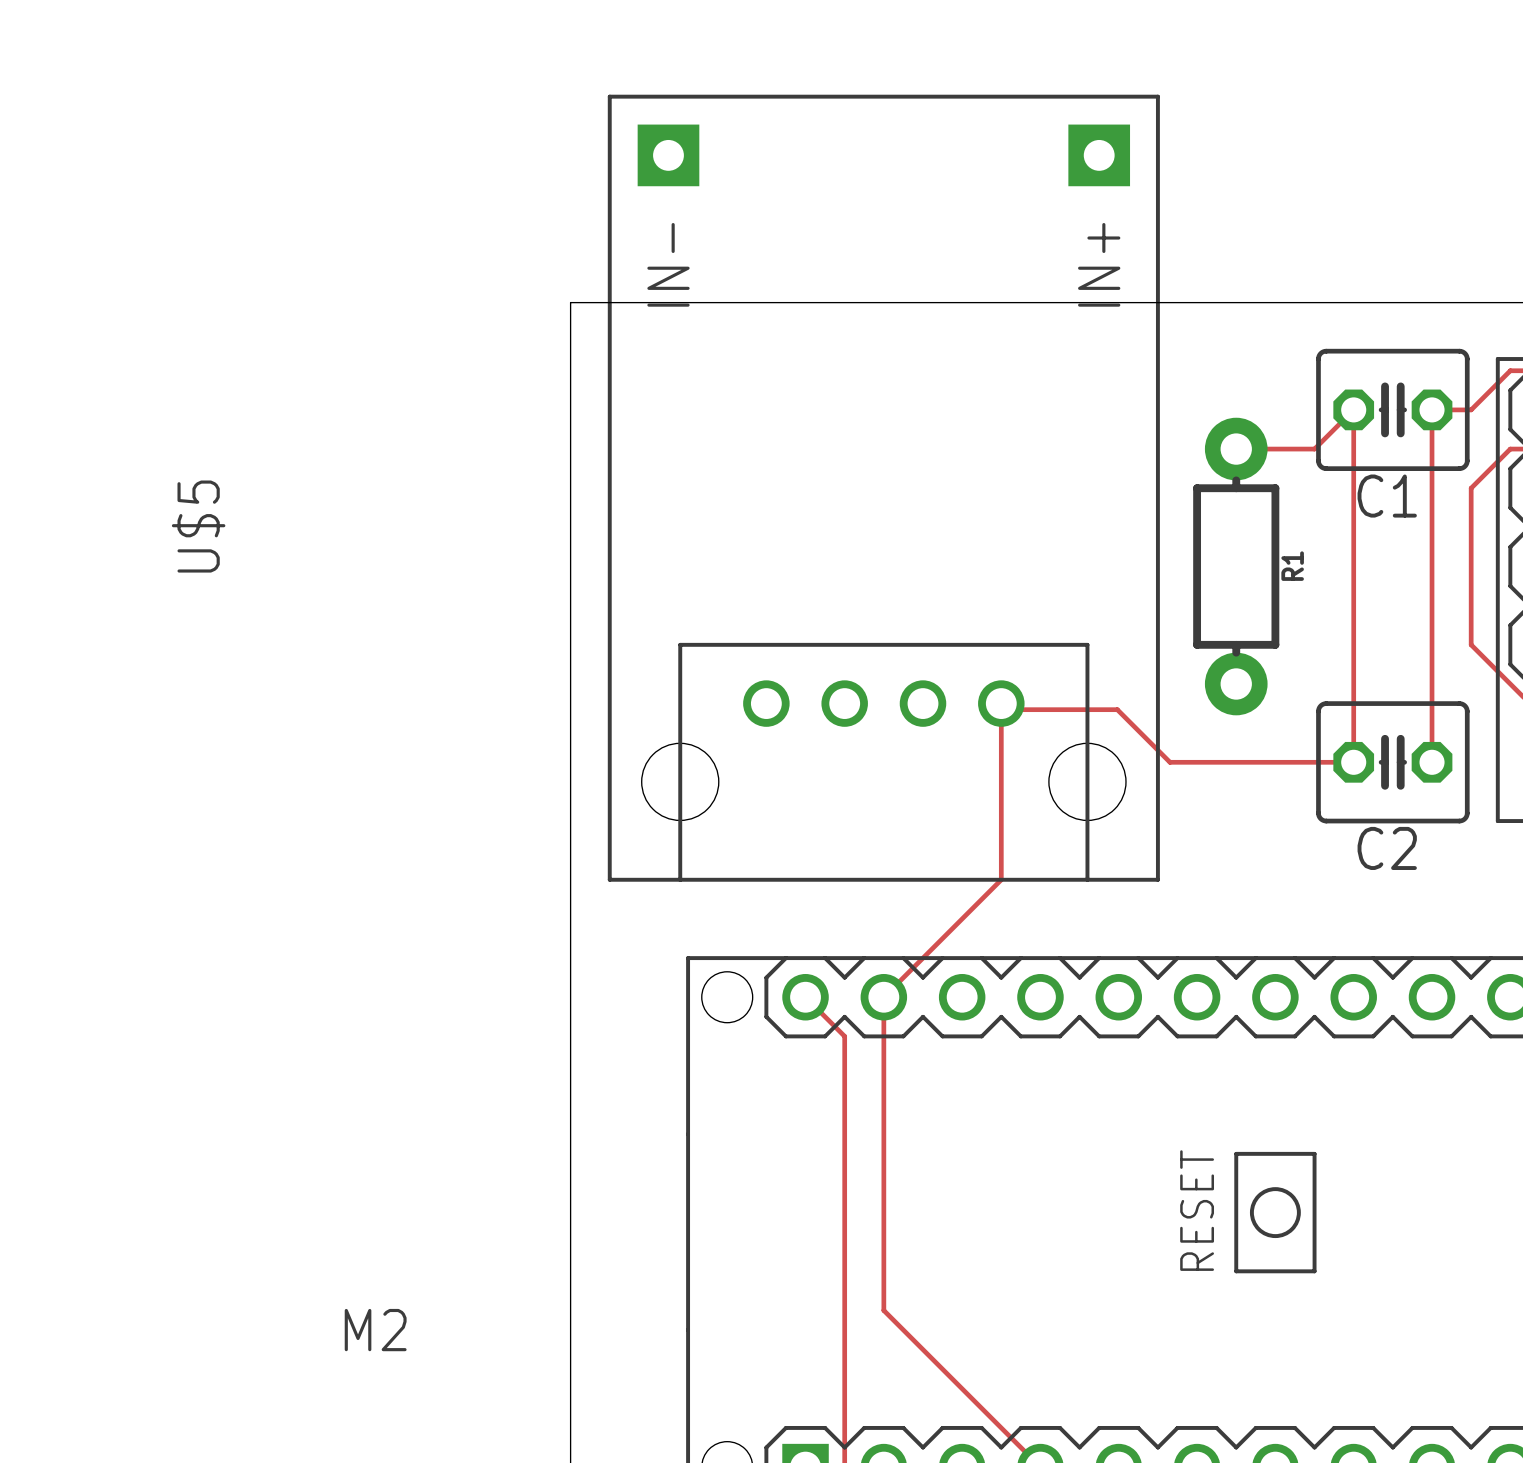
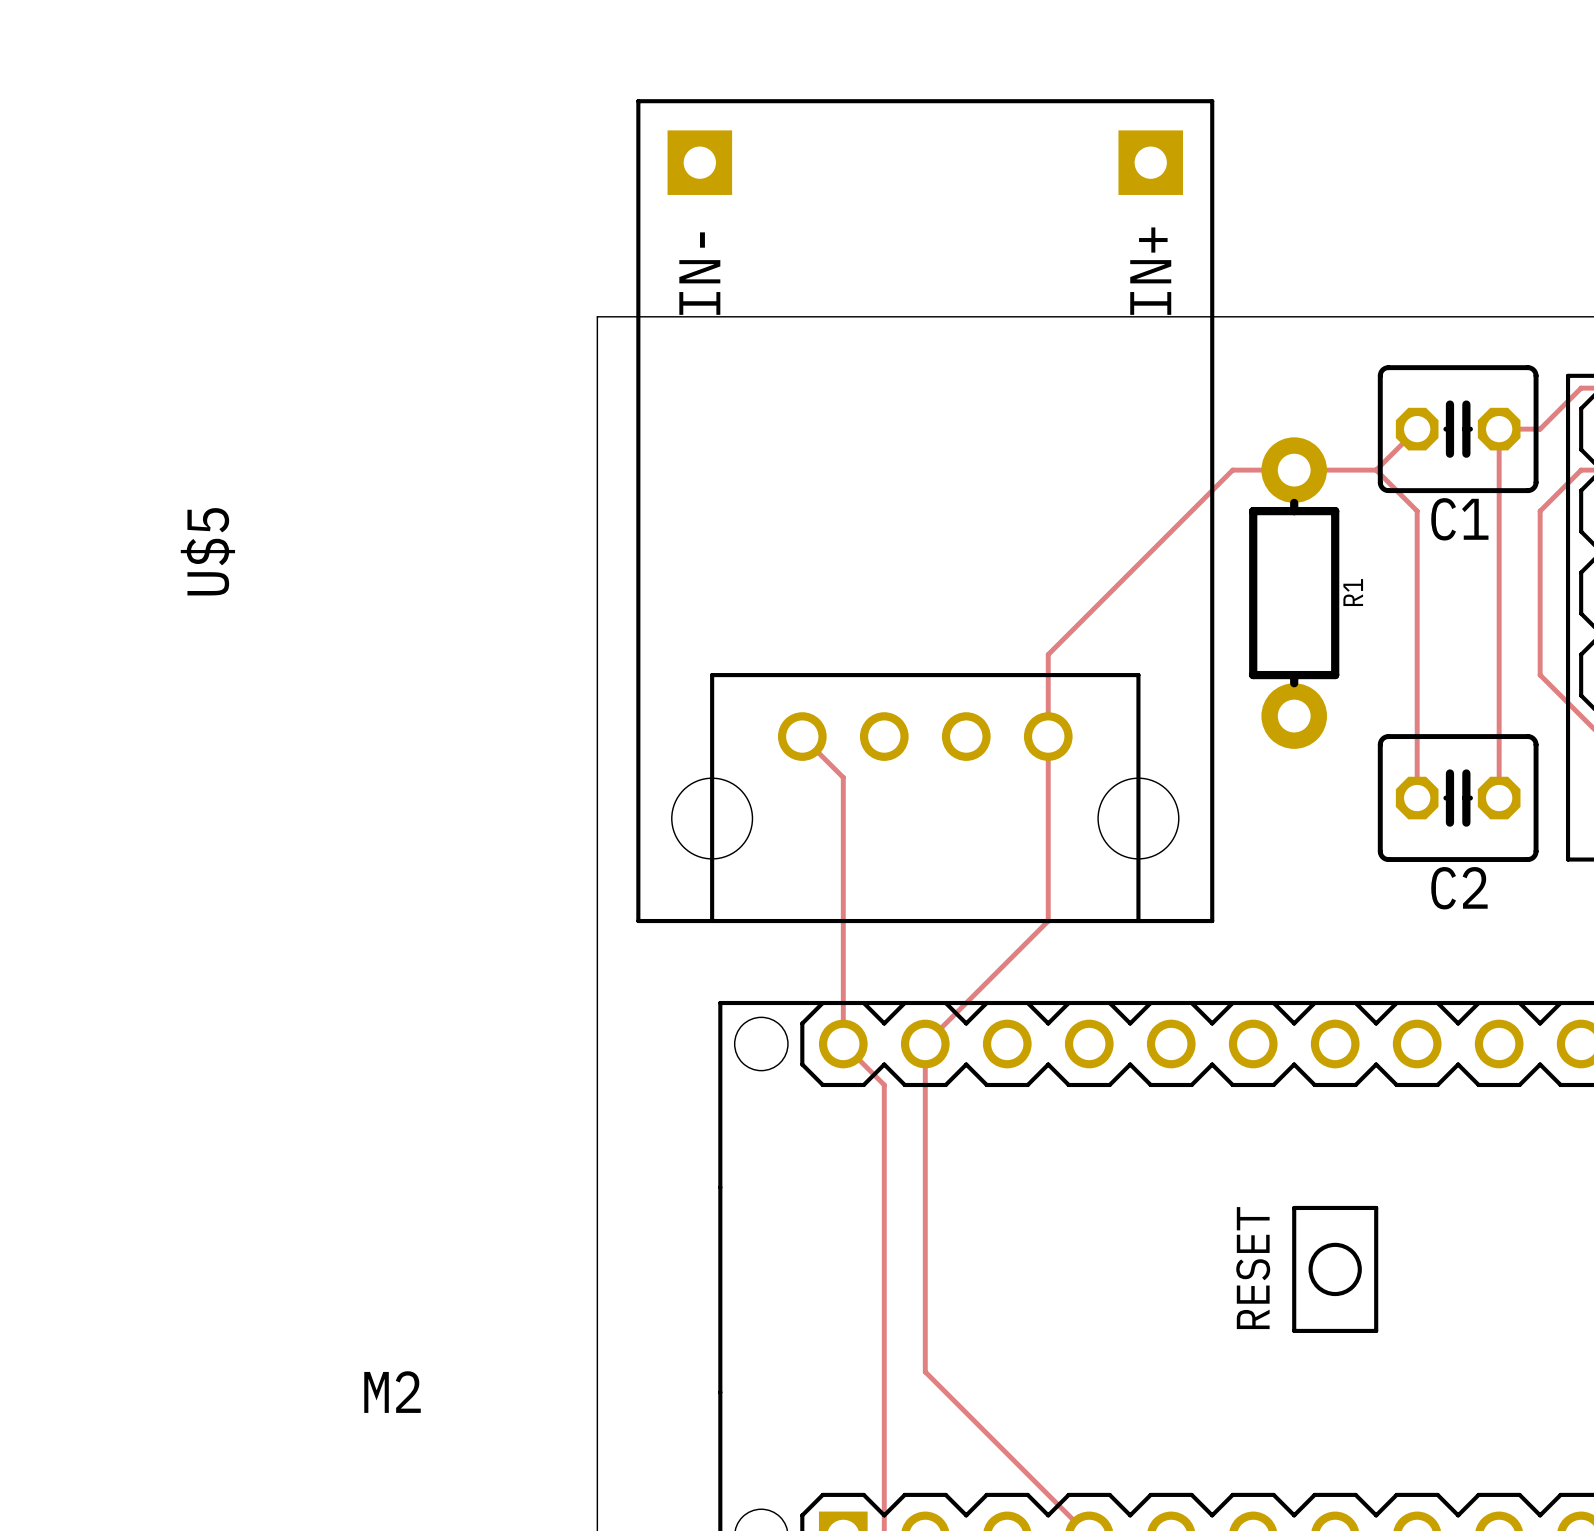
track: (1353, 409) (1353, 488) -> (1376, 470) (1417, 511)
track: none -> (1294, 470) (1232, 470) (1048, 654) (1048, 736)
track: none -> (802, 736) (843, 777) (843, 1044)
track: (1007, 709) (1117, 709) (1170, 762) (1353, 762) -> none

